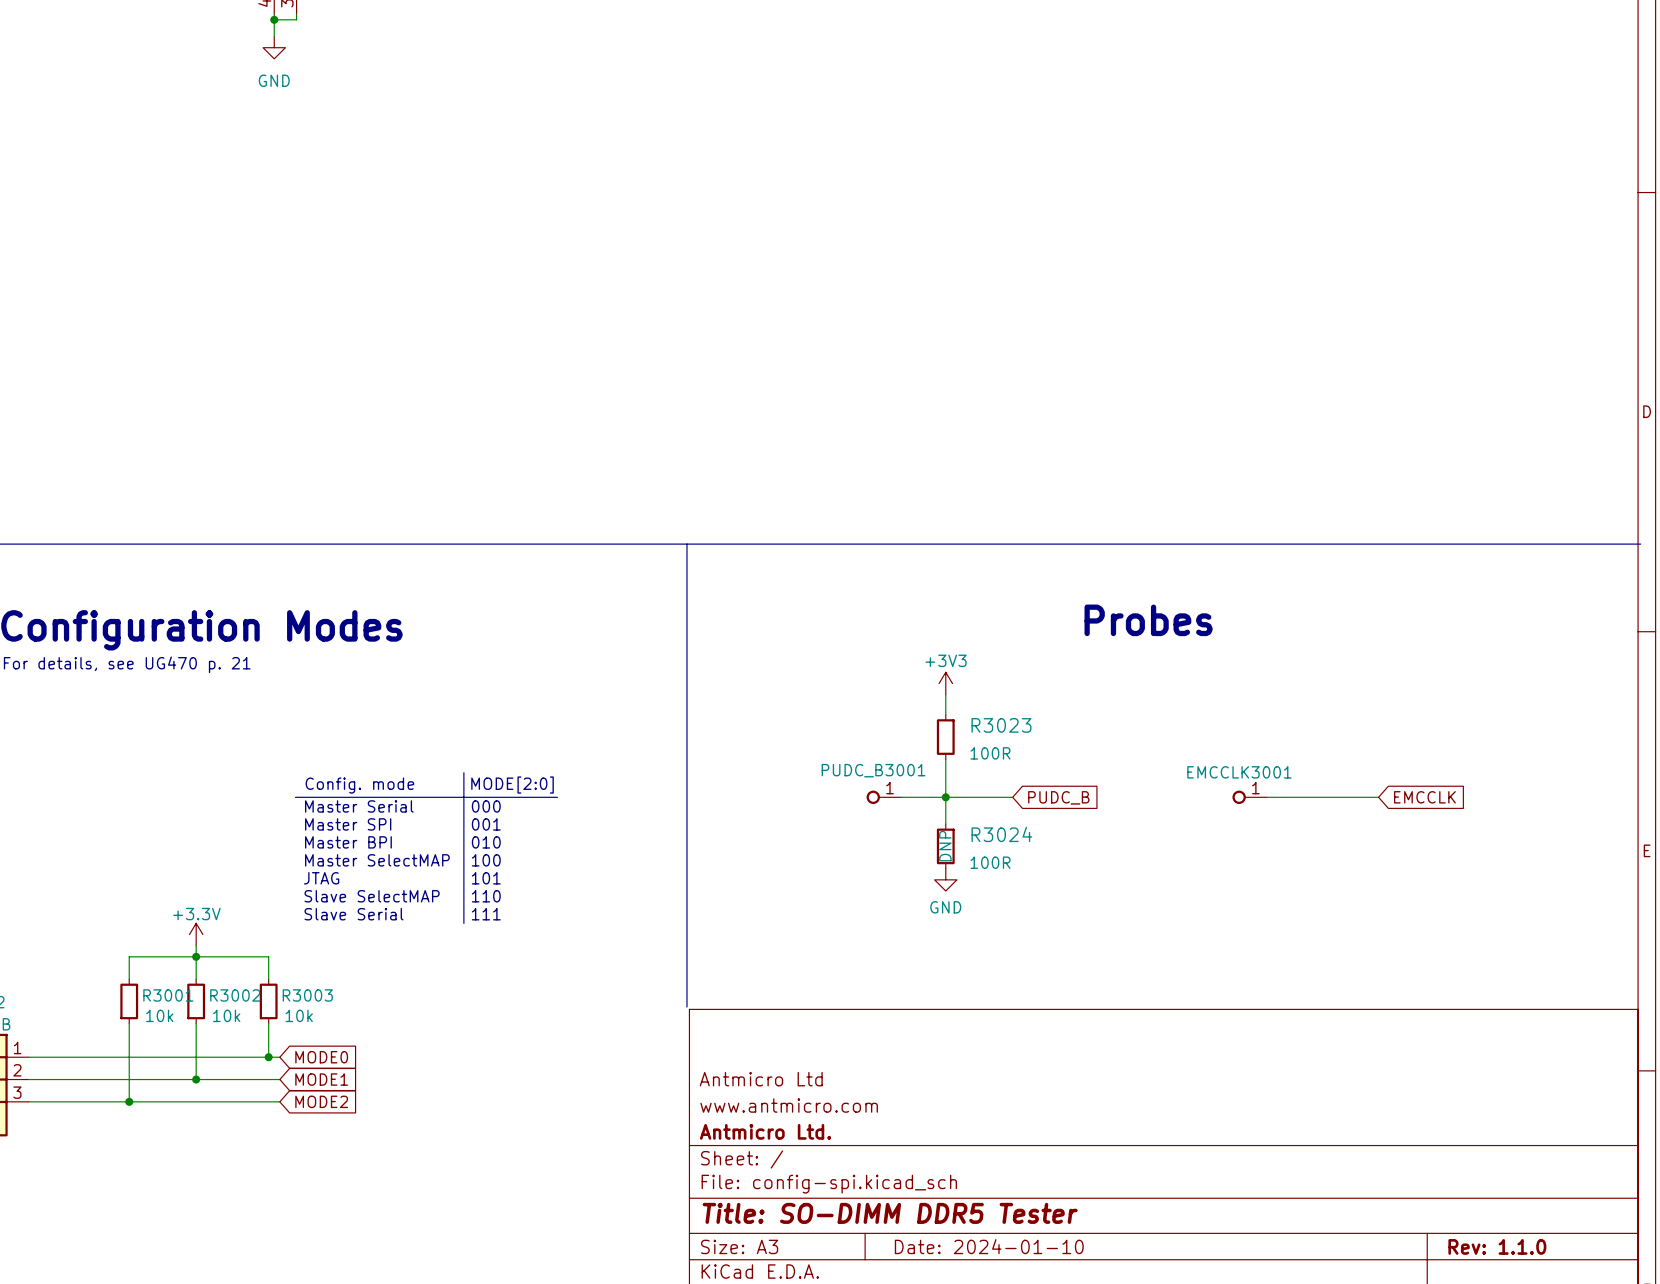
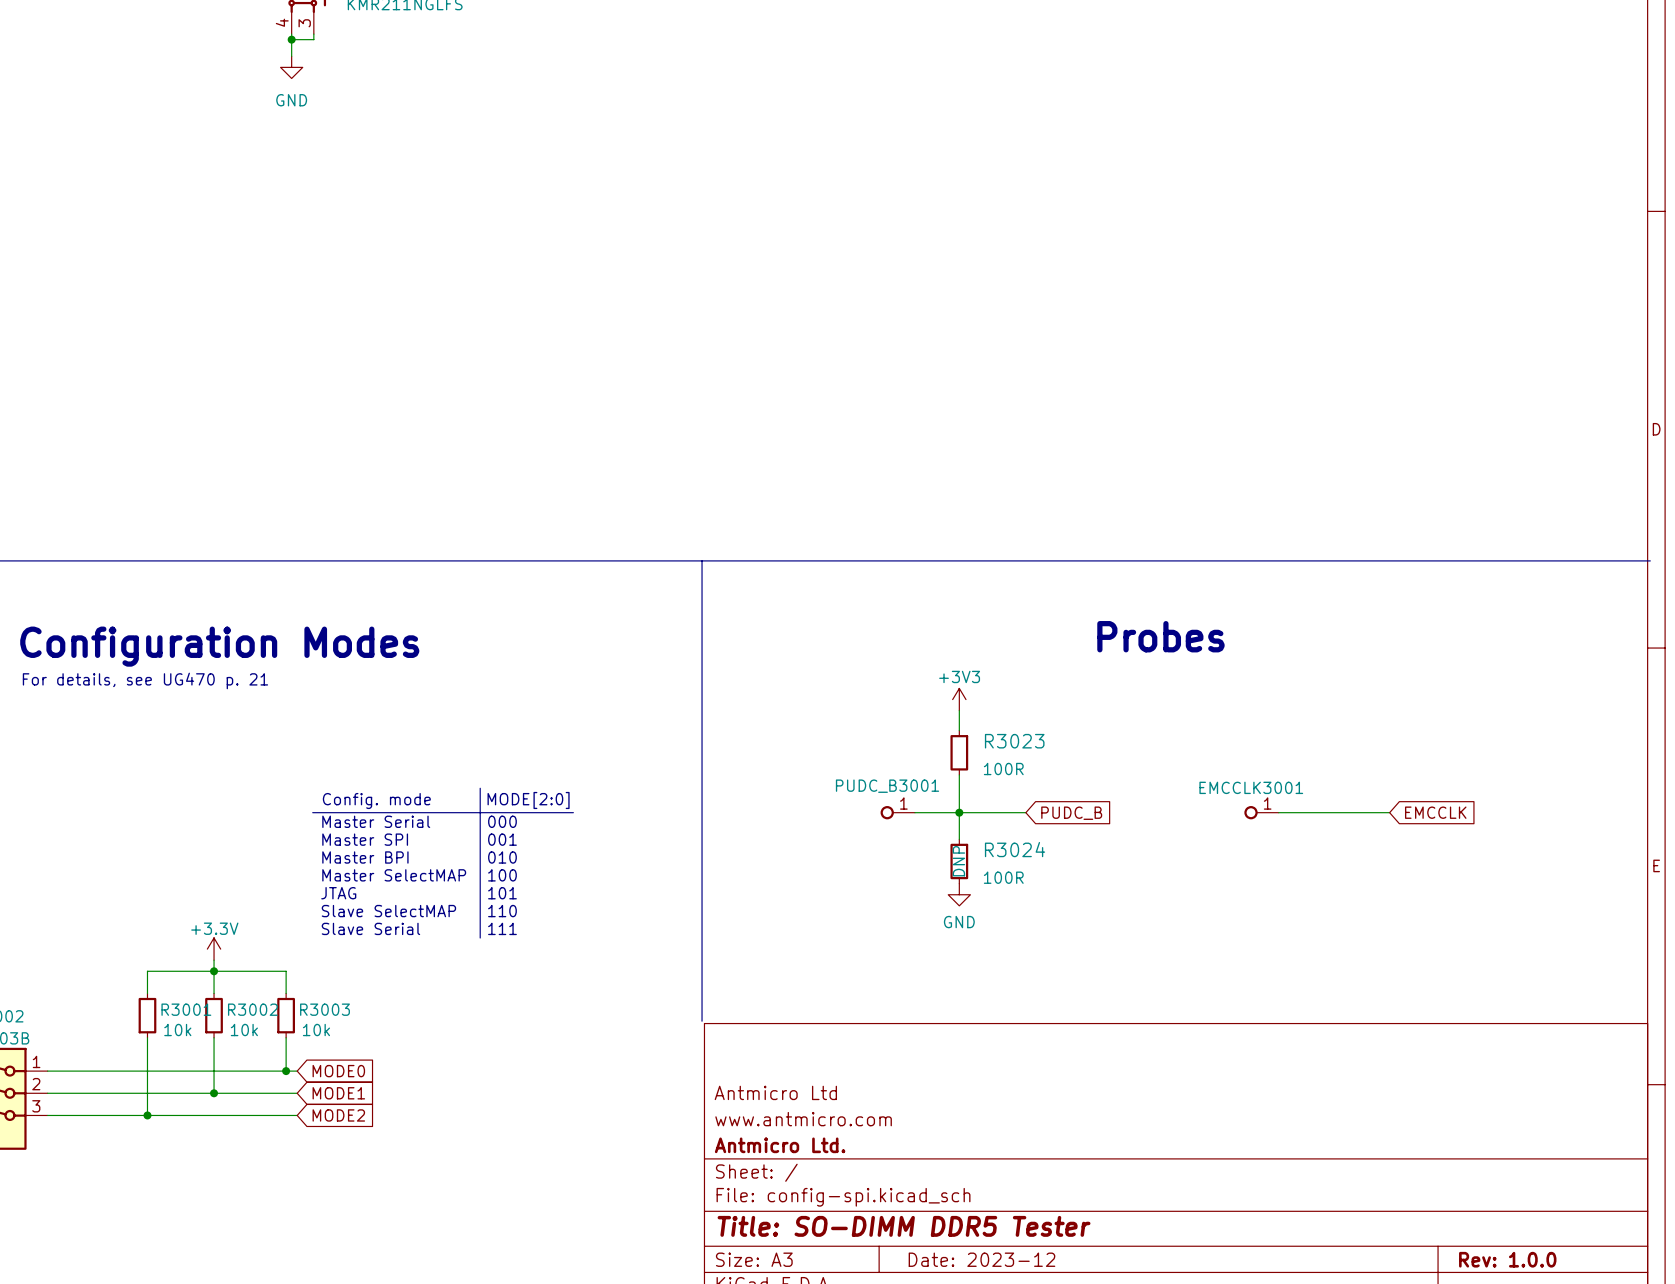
title block: Date: 2024-01-10 (989, 1246) -> Date: 2023-12 (981, 1259)
title block: Rev: 1.1.0 (1497, 1246) -> Rev: 1.0.0 (1507, 1259)

